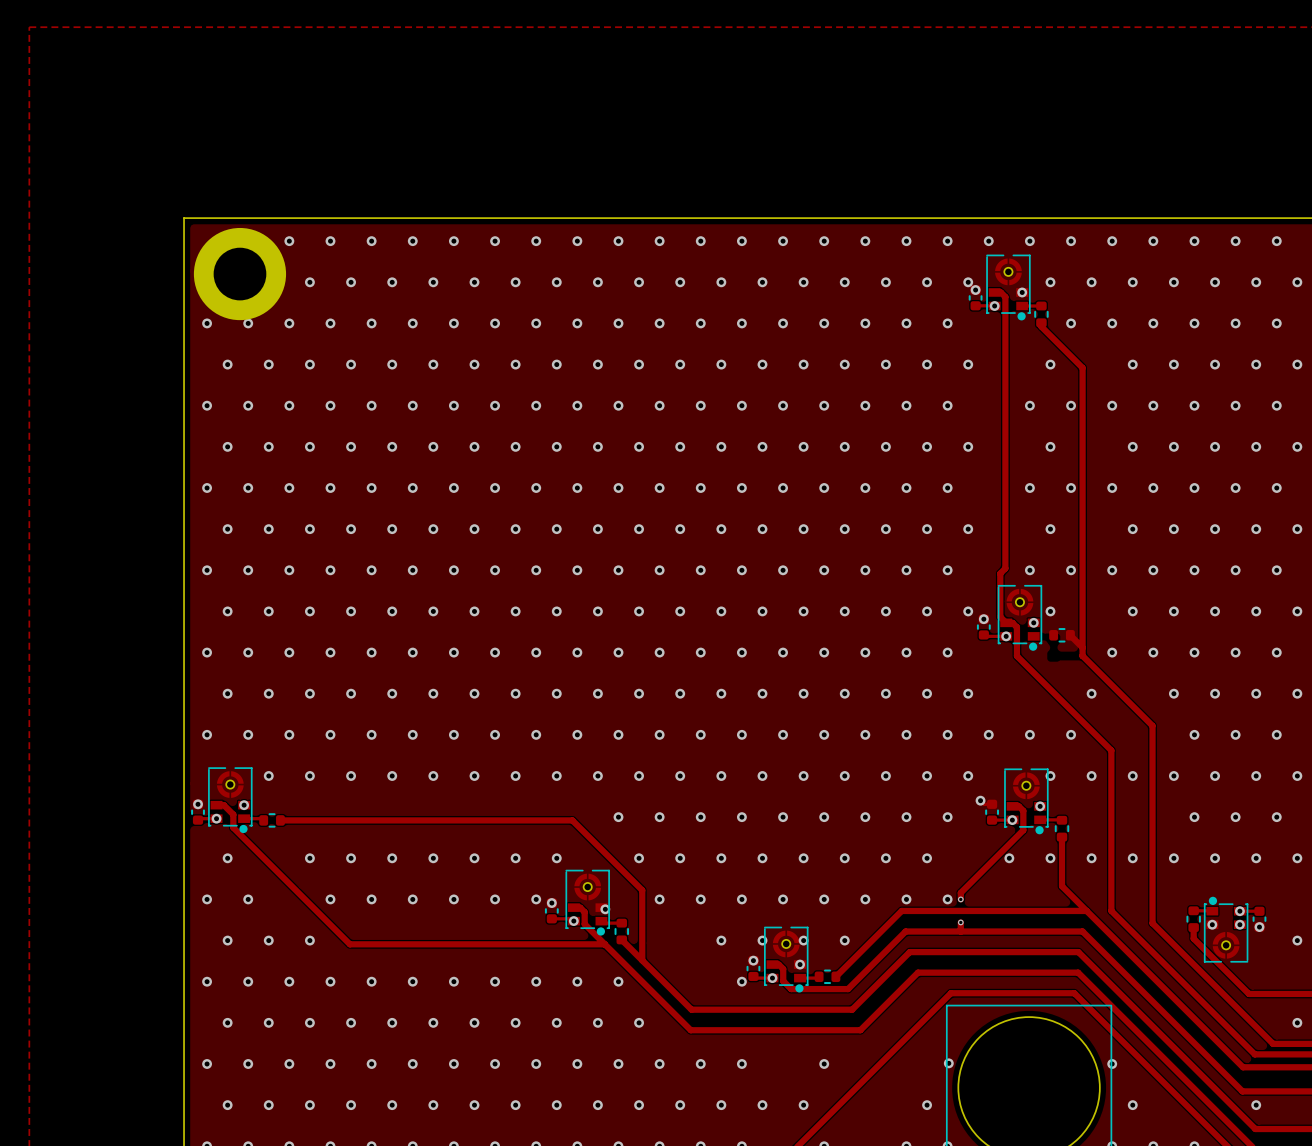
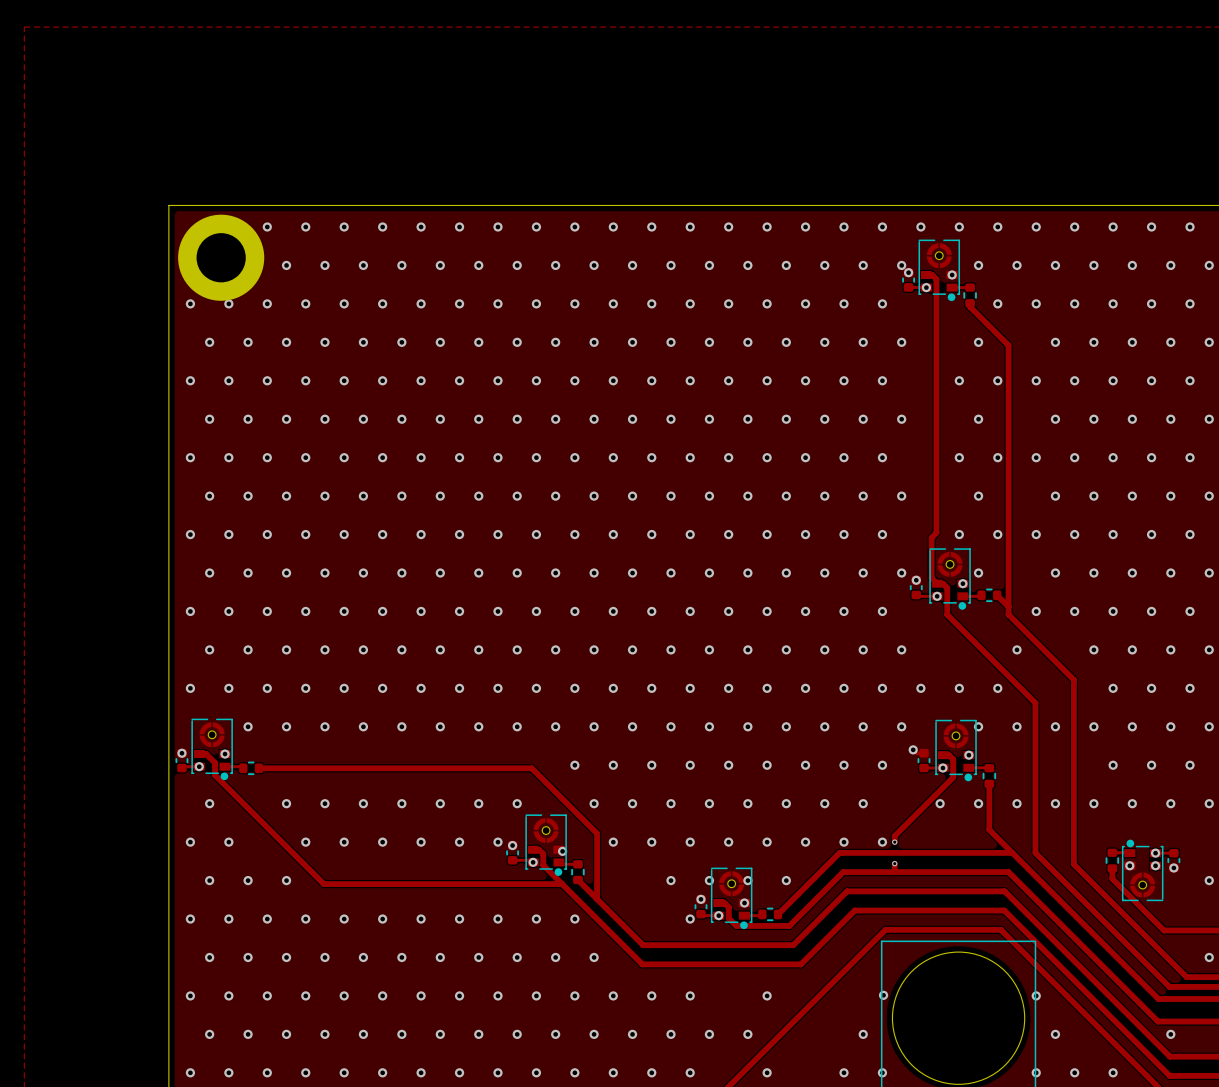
track: none -> (981, 595) (962, 596)

